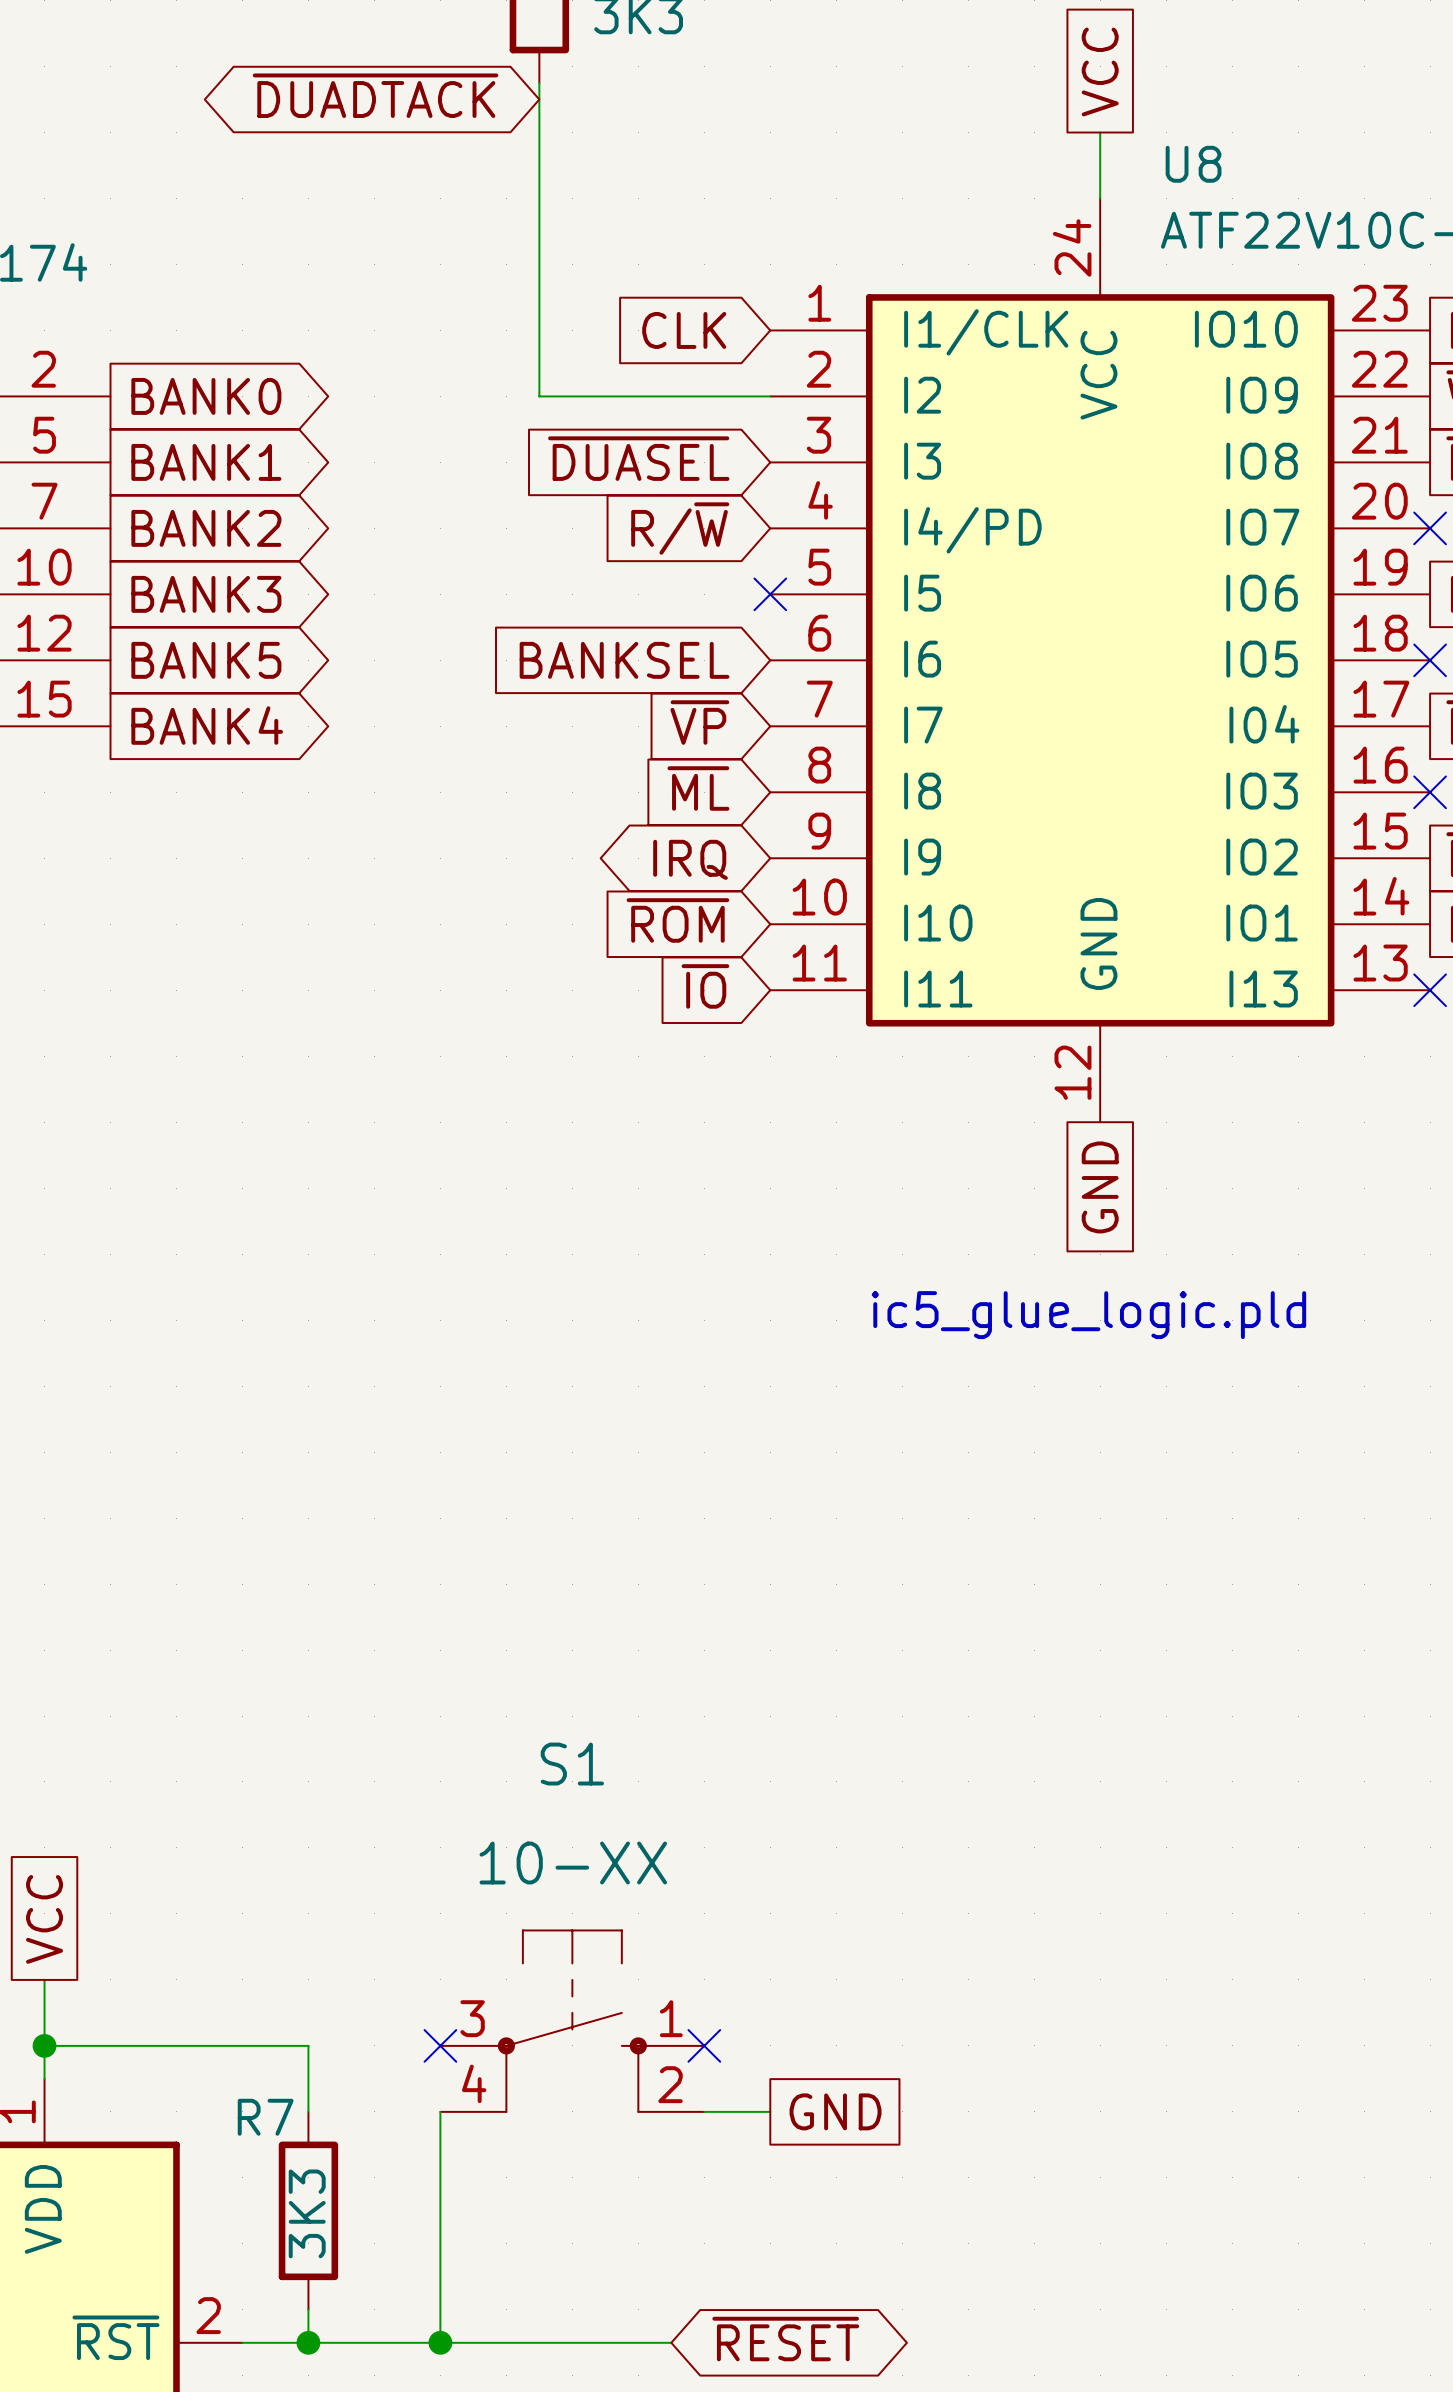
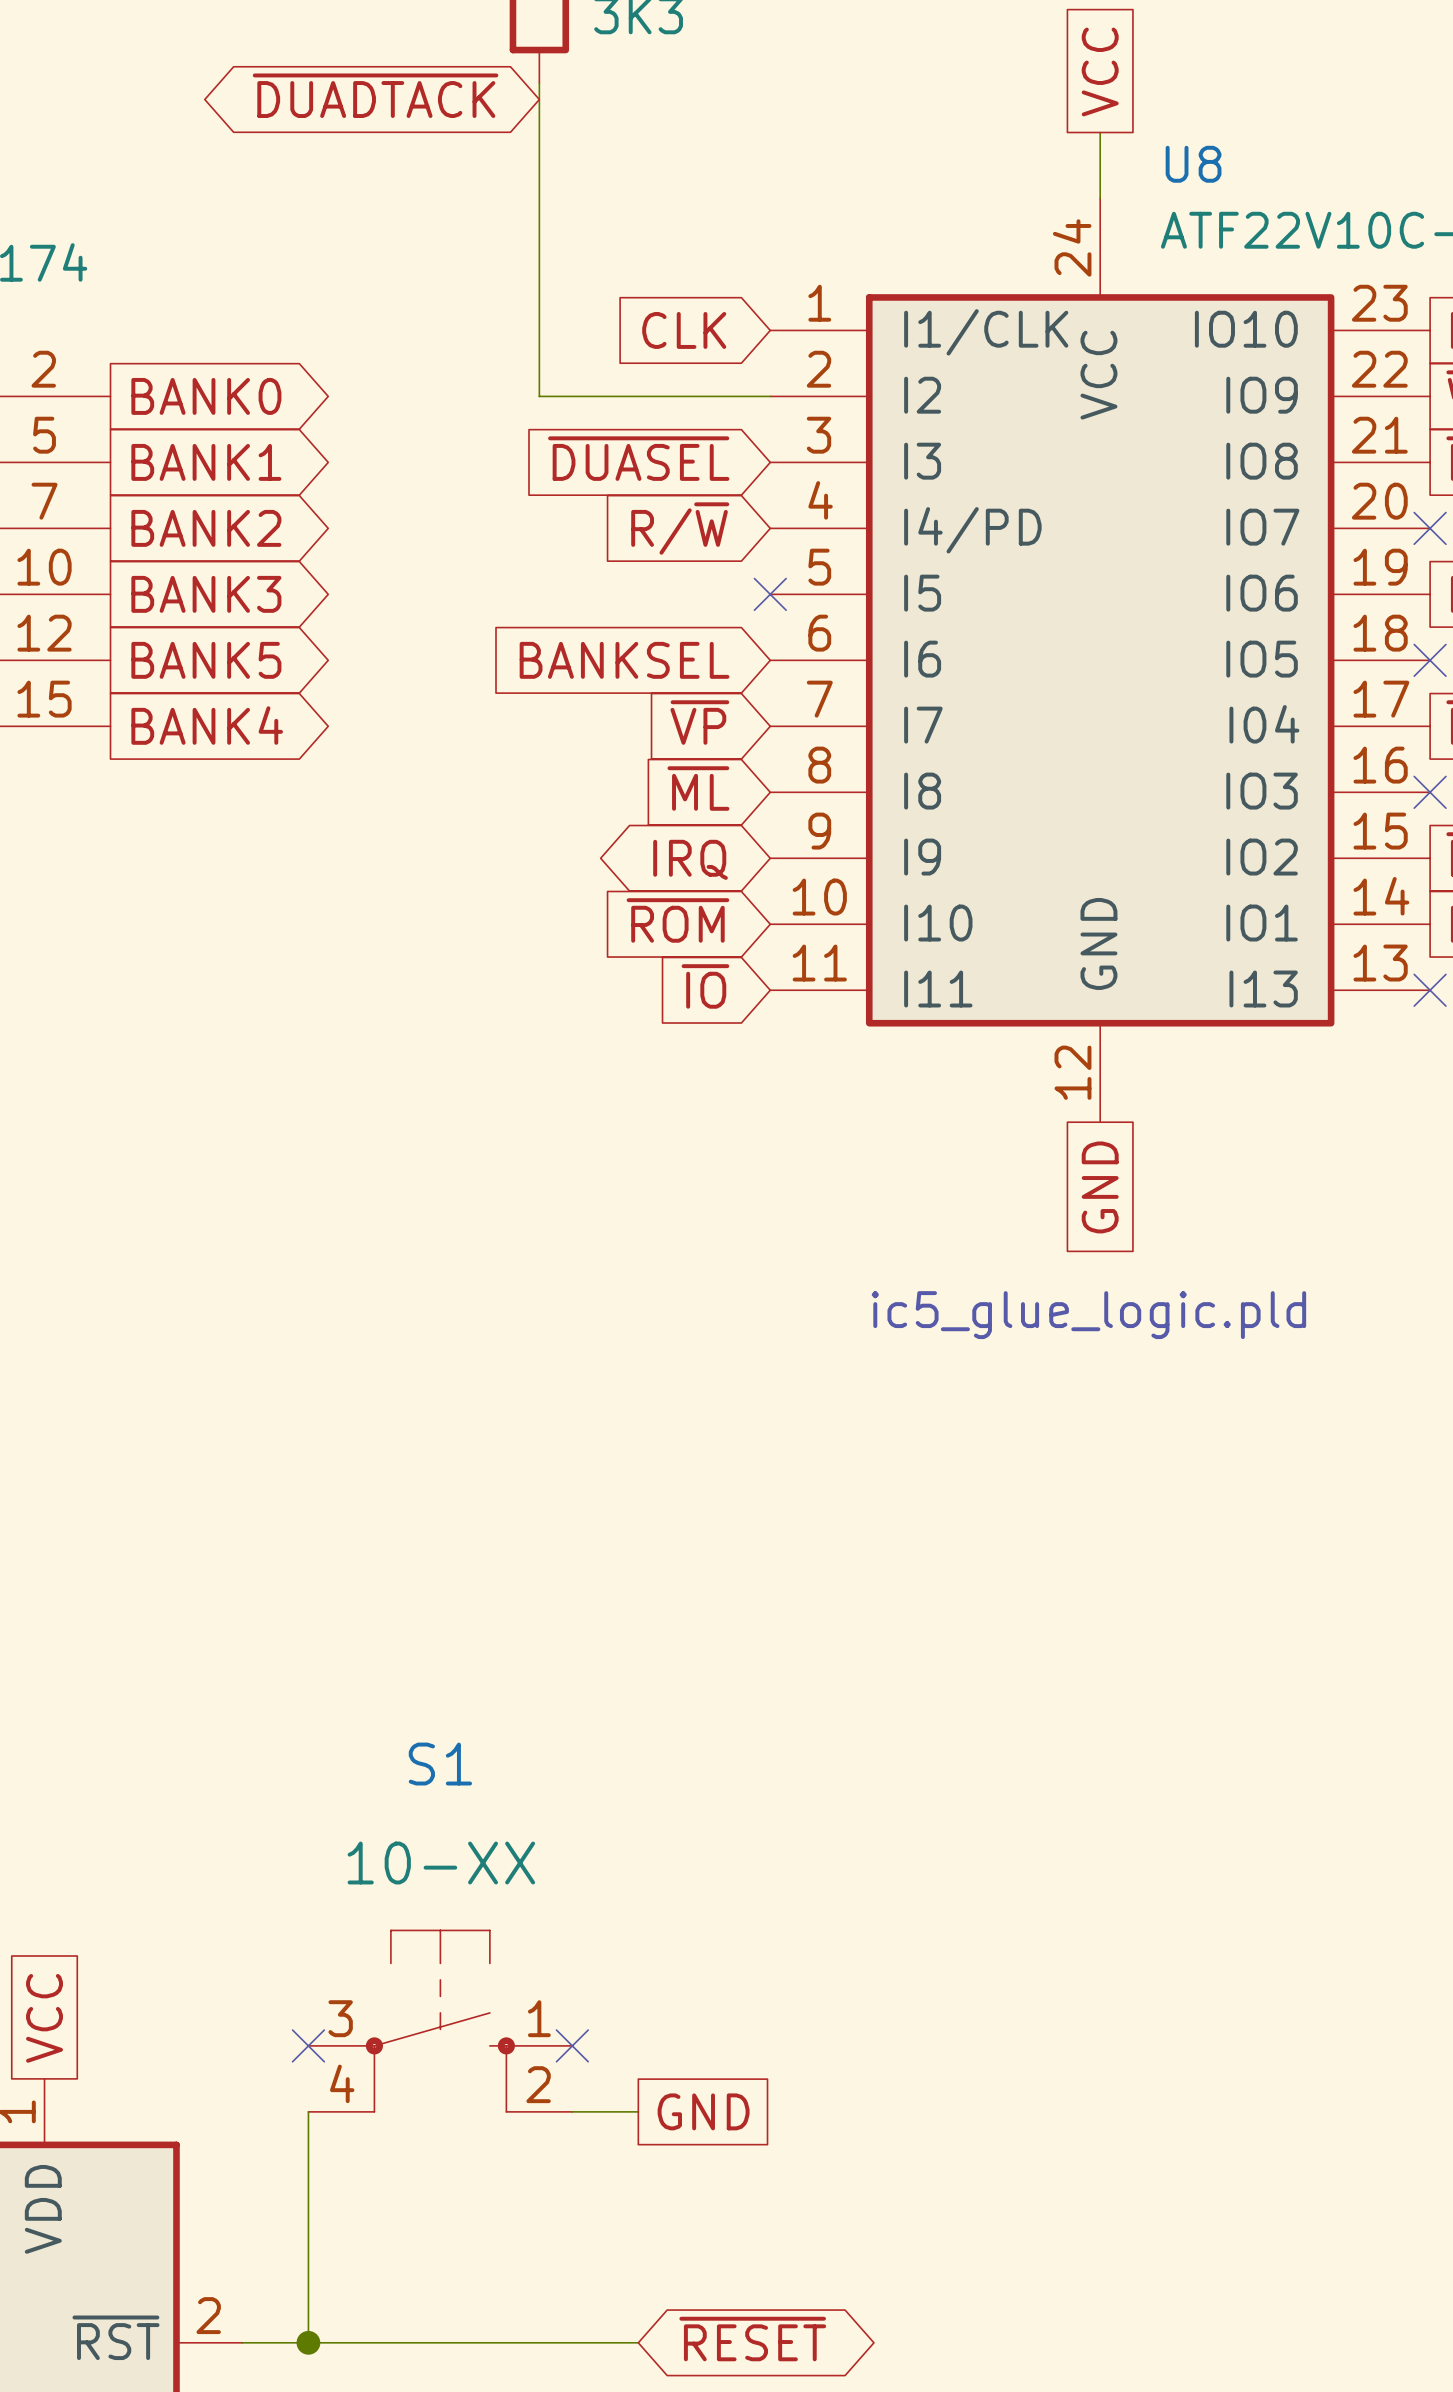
global label position: VCC (44, 1919) -> VCC (44, 2018)
wire: (44, 1979) (44, 2078) -> none
S1 position: (572, 2021) -> (440, 2021)
wire: (44, 2045) (308, 2045) (308, 2111) -> (308, 2309) (308, 2111)
junction: (44, 2045) -> none
no-connect mark: none -> (308, 2045)
no-connect mark: (440, 2045) -> none
no-connect mark: none -> (572, 2045)
no-connect mark: (704, 2045) -> none
wire: (440, 2111) (440, 2342) -> none
wire: (704, 2111) (770, 2111) -> (572, 2111) (638, 2111)
global label position: GND (835, 2111) -> GND (703, 2111)
R7: 3K3 (308, 2210) -> none
global label position: ~{RESET} (785, 2339) -> ~{RESET} (752, 2339)
junction: (440, 2342) -> none
wire: (638, 2342) (671, 2342) -> none

